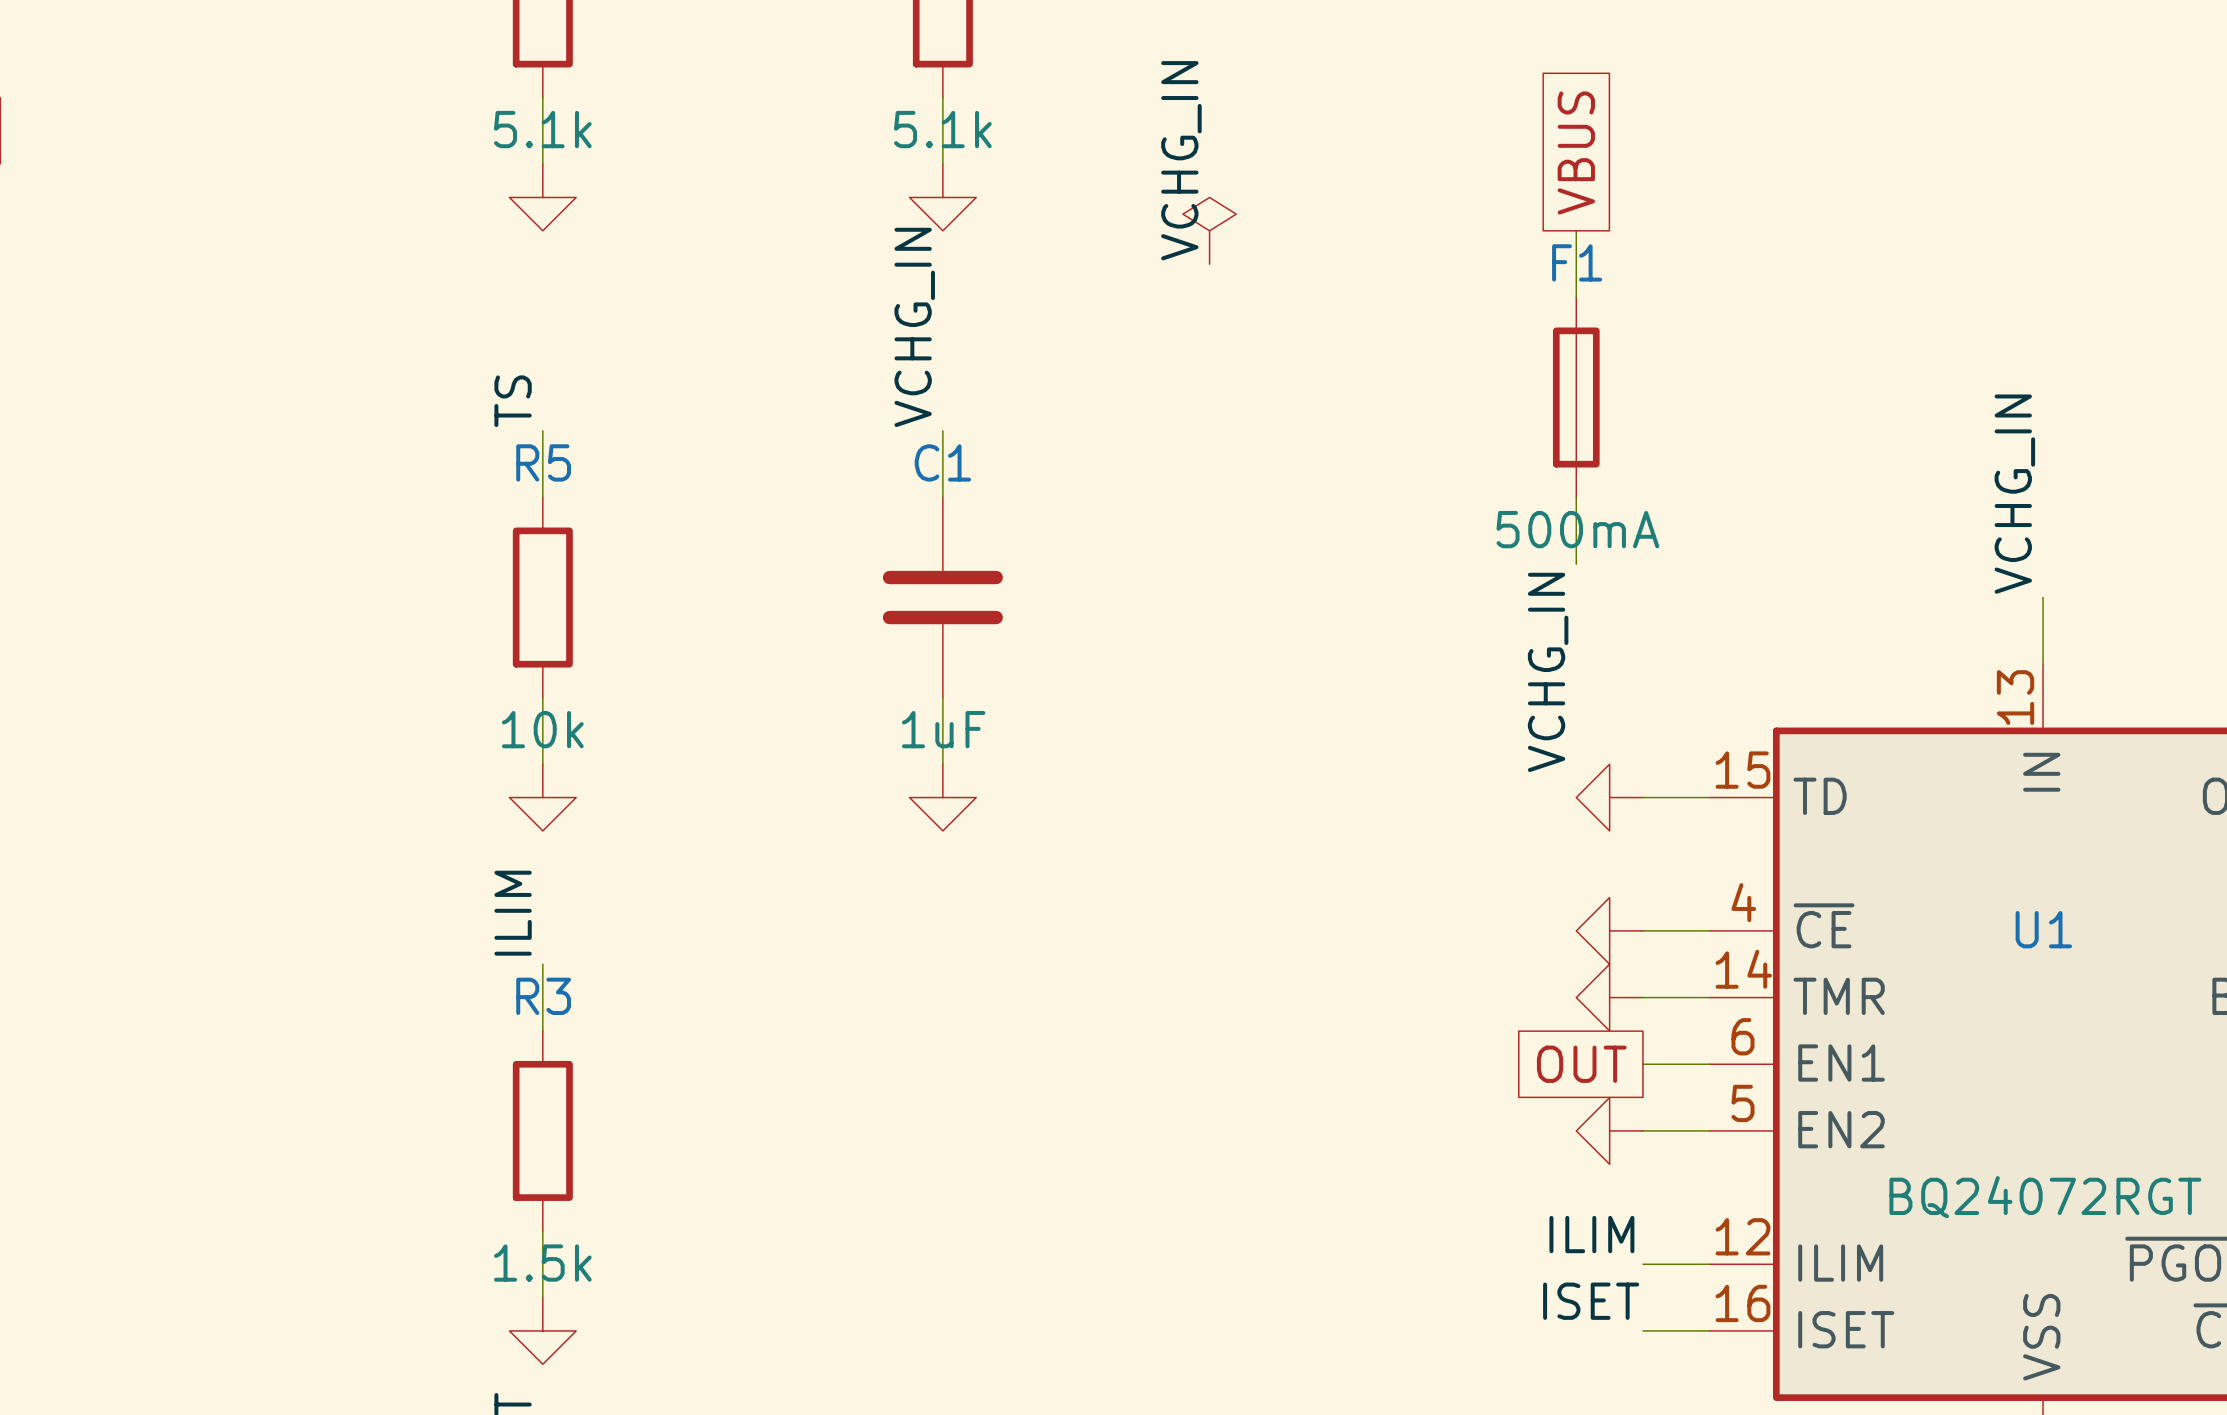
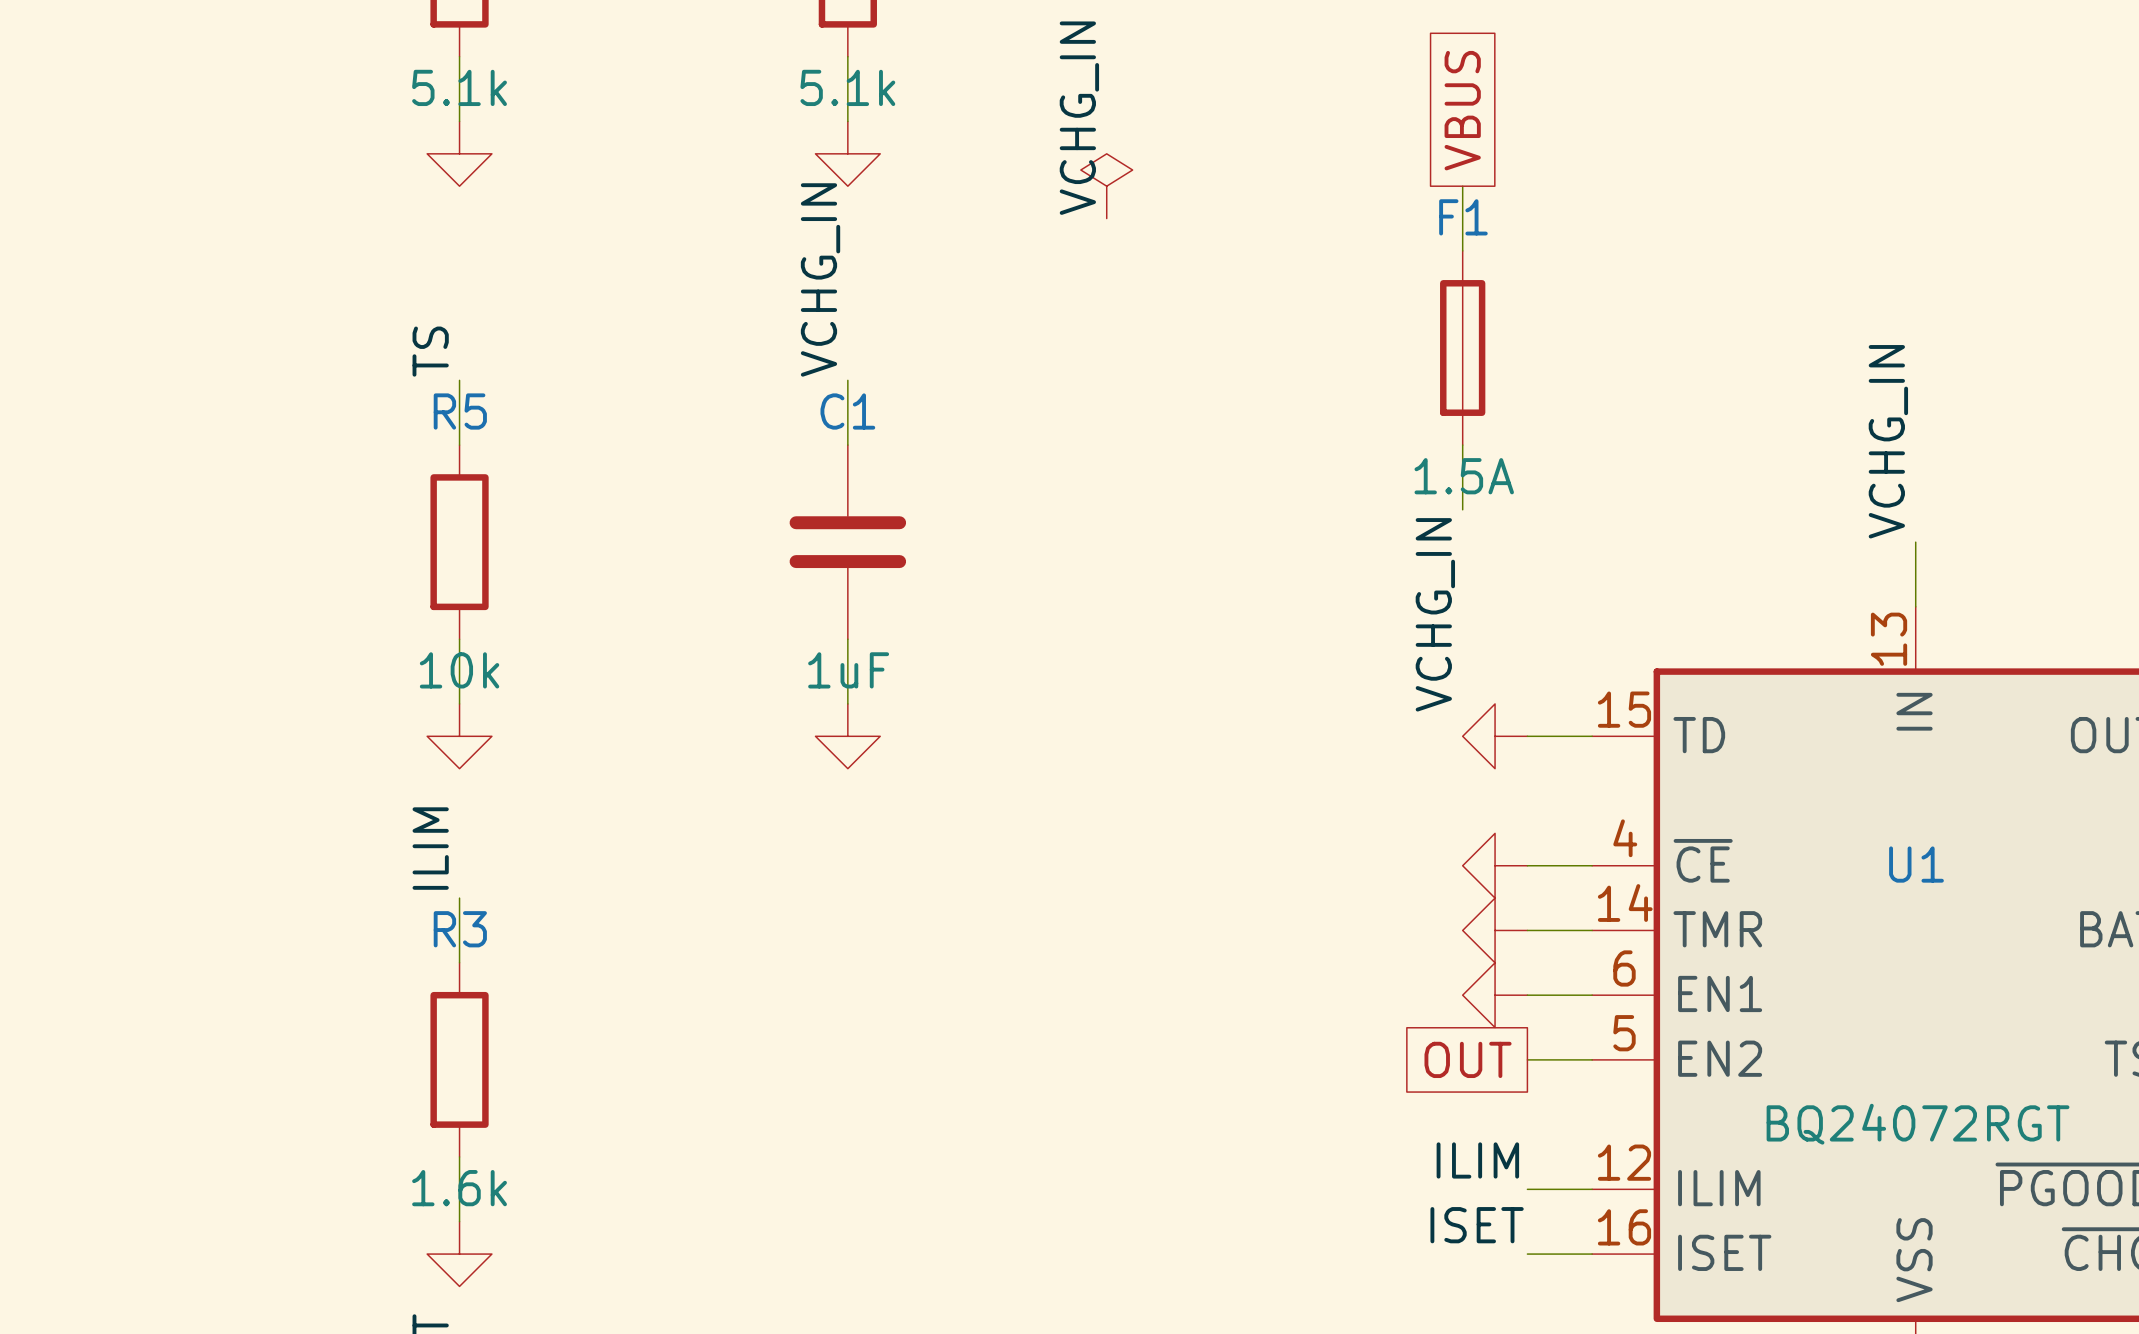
F1 value: 500mA (1577, 529) -> 1.5A (1464, 476)
global label position: OUT (1581, 1064) -> OUT (1468, 1059)
power symbol position: (1609, 1130) -> (1495, 995)
R3 value: 1.5k (542, 1263) -> 1.6k (459, 1188)

